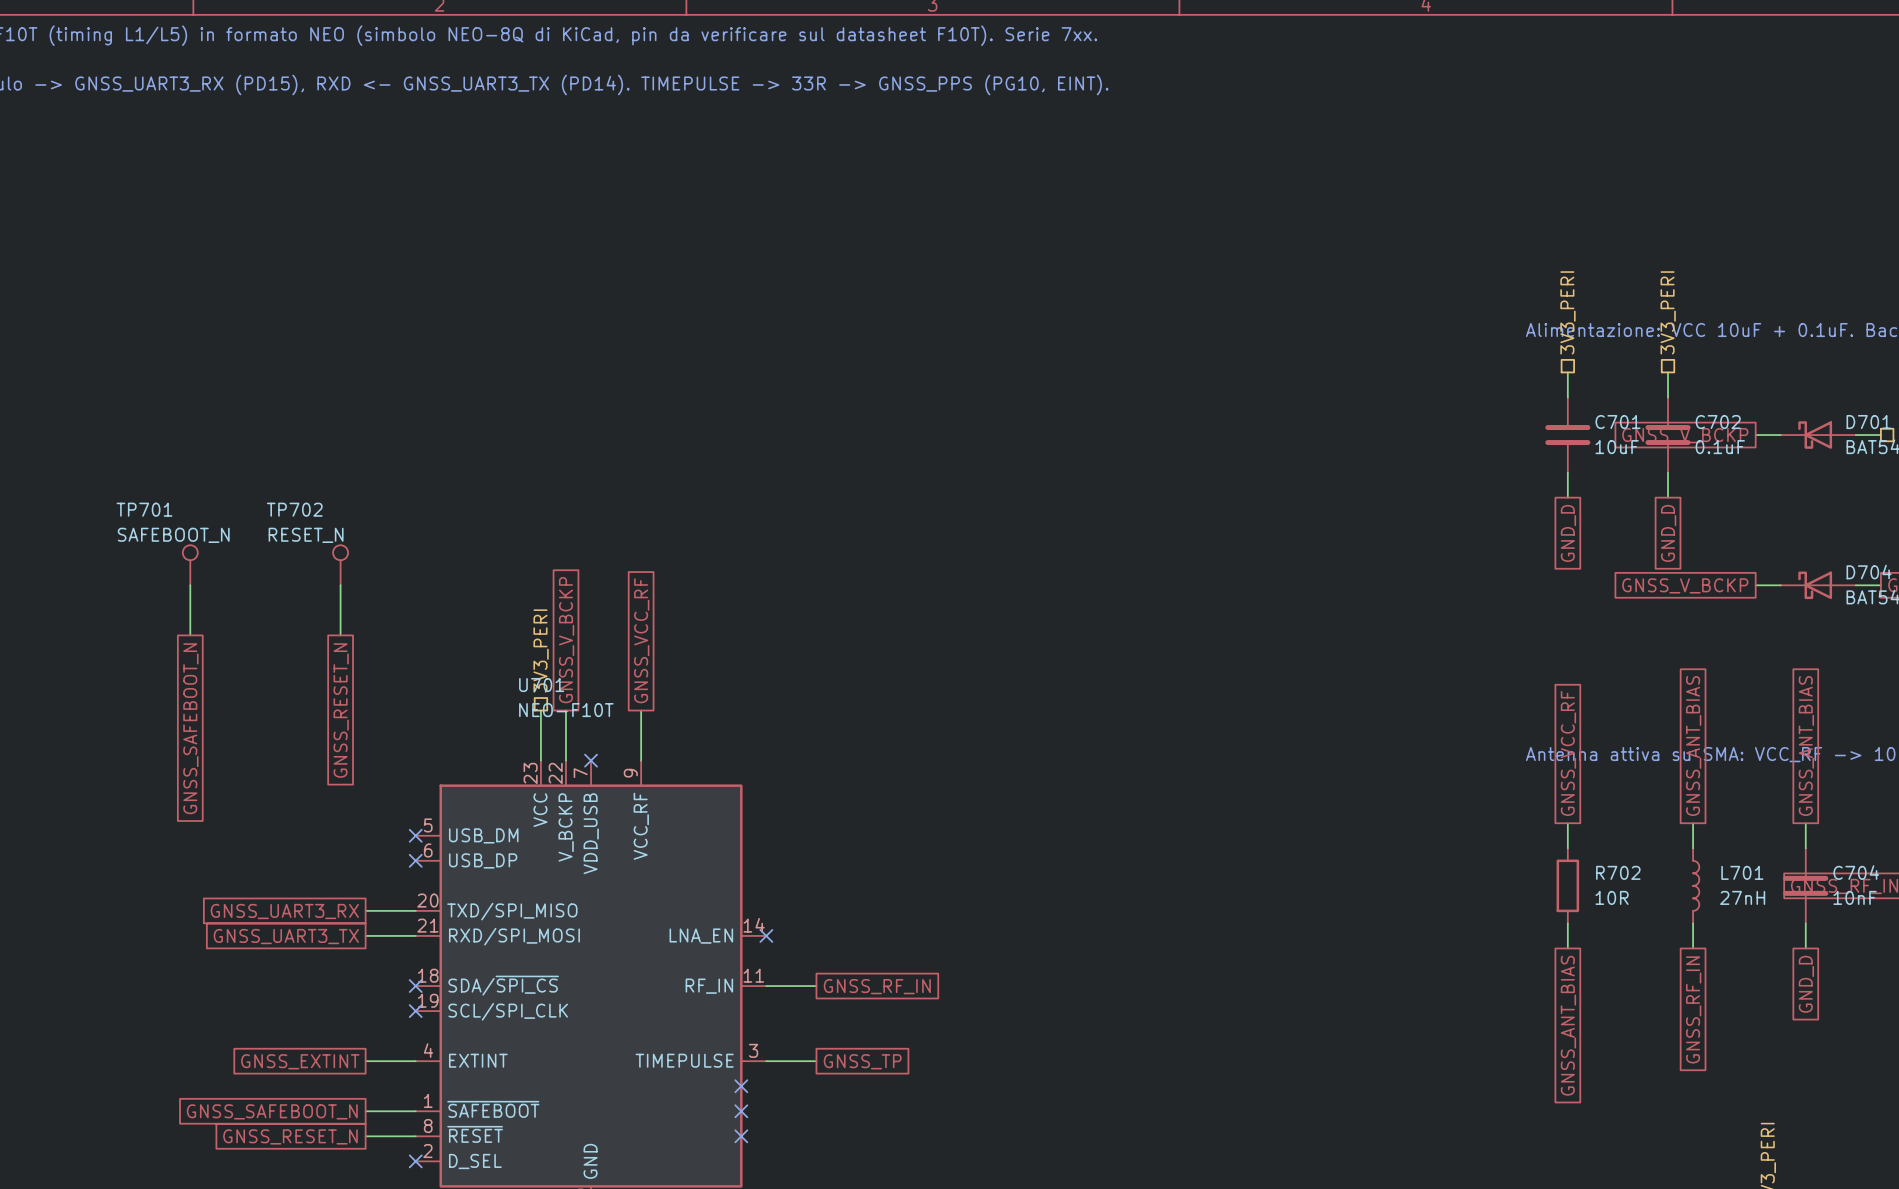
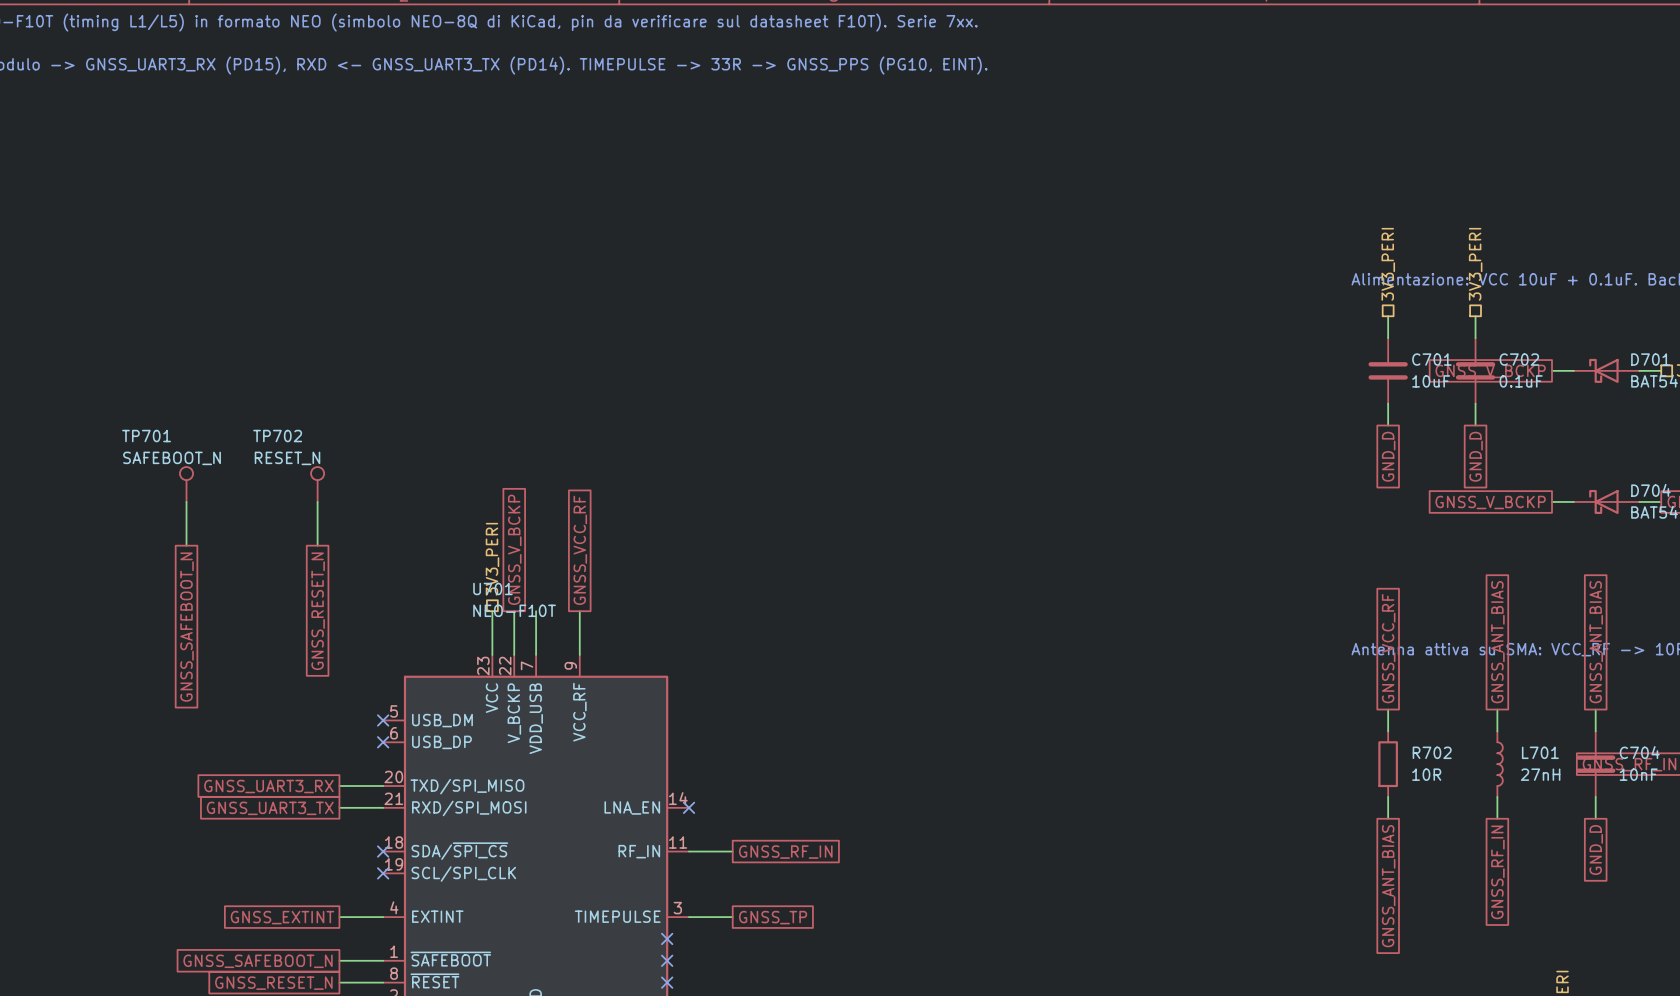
wire: none -> (536, 611) (536, 654)
no-connect mark: (591, 760) -> none

